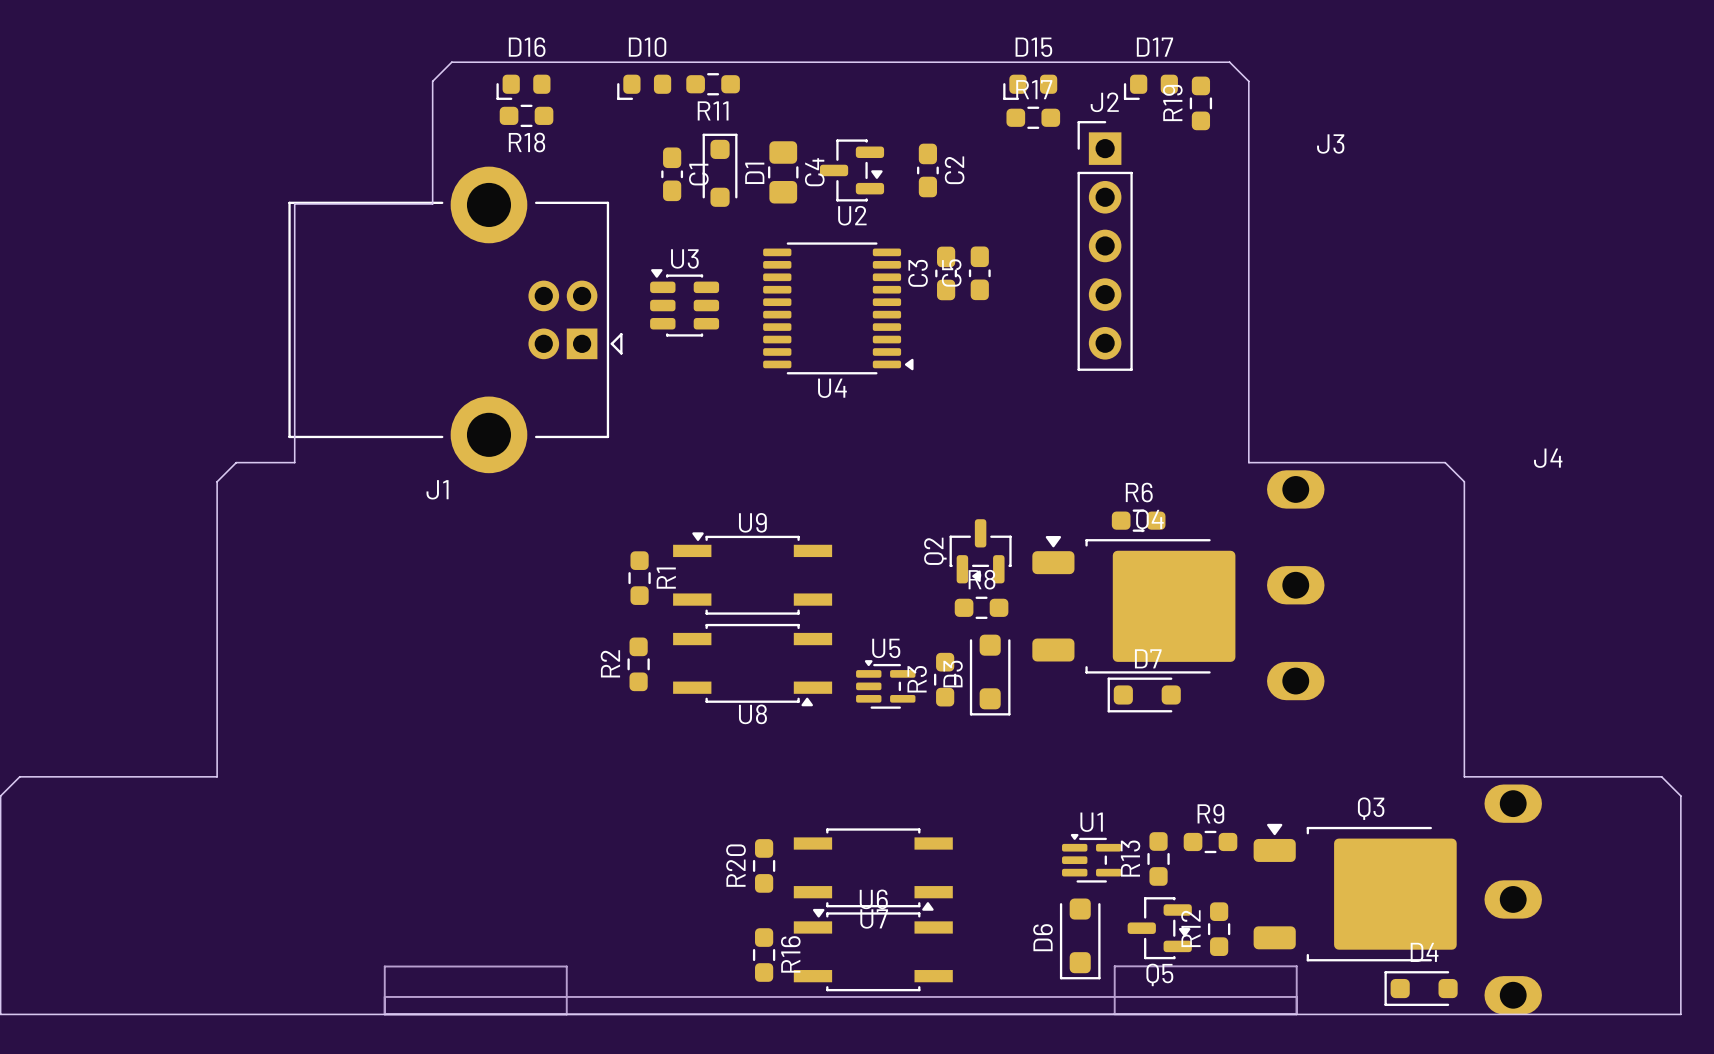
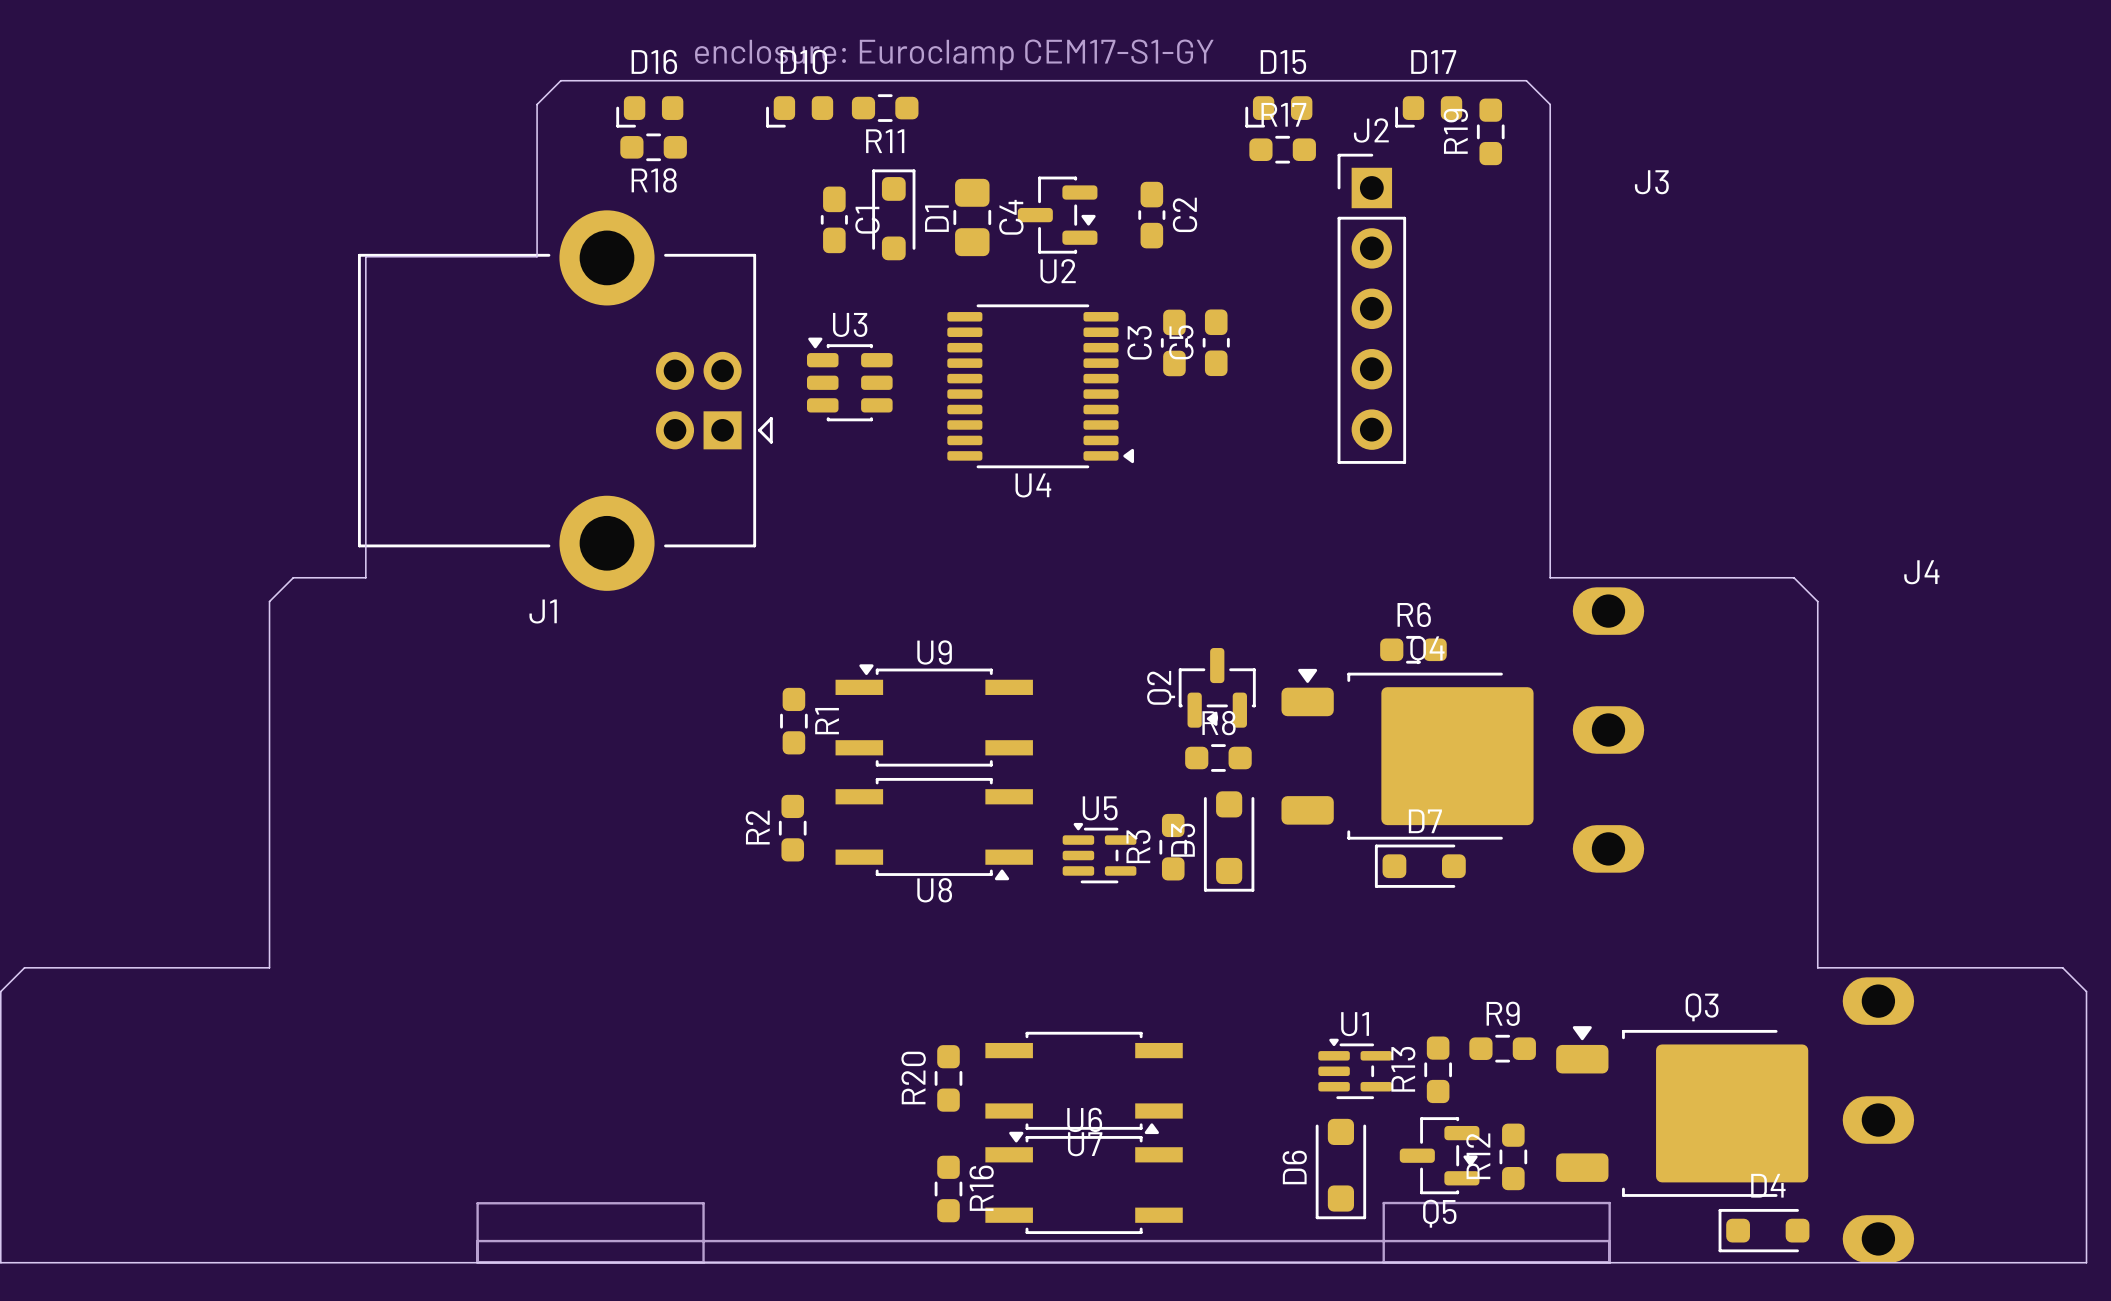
text: none -> enclosure: Euroclamp CEM17-S1-GY (954, 54)

